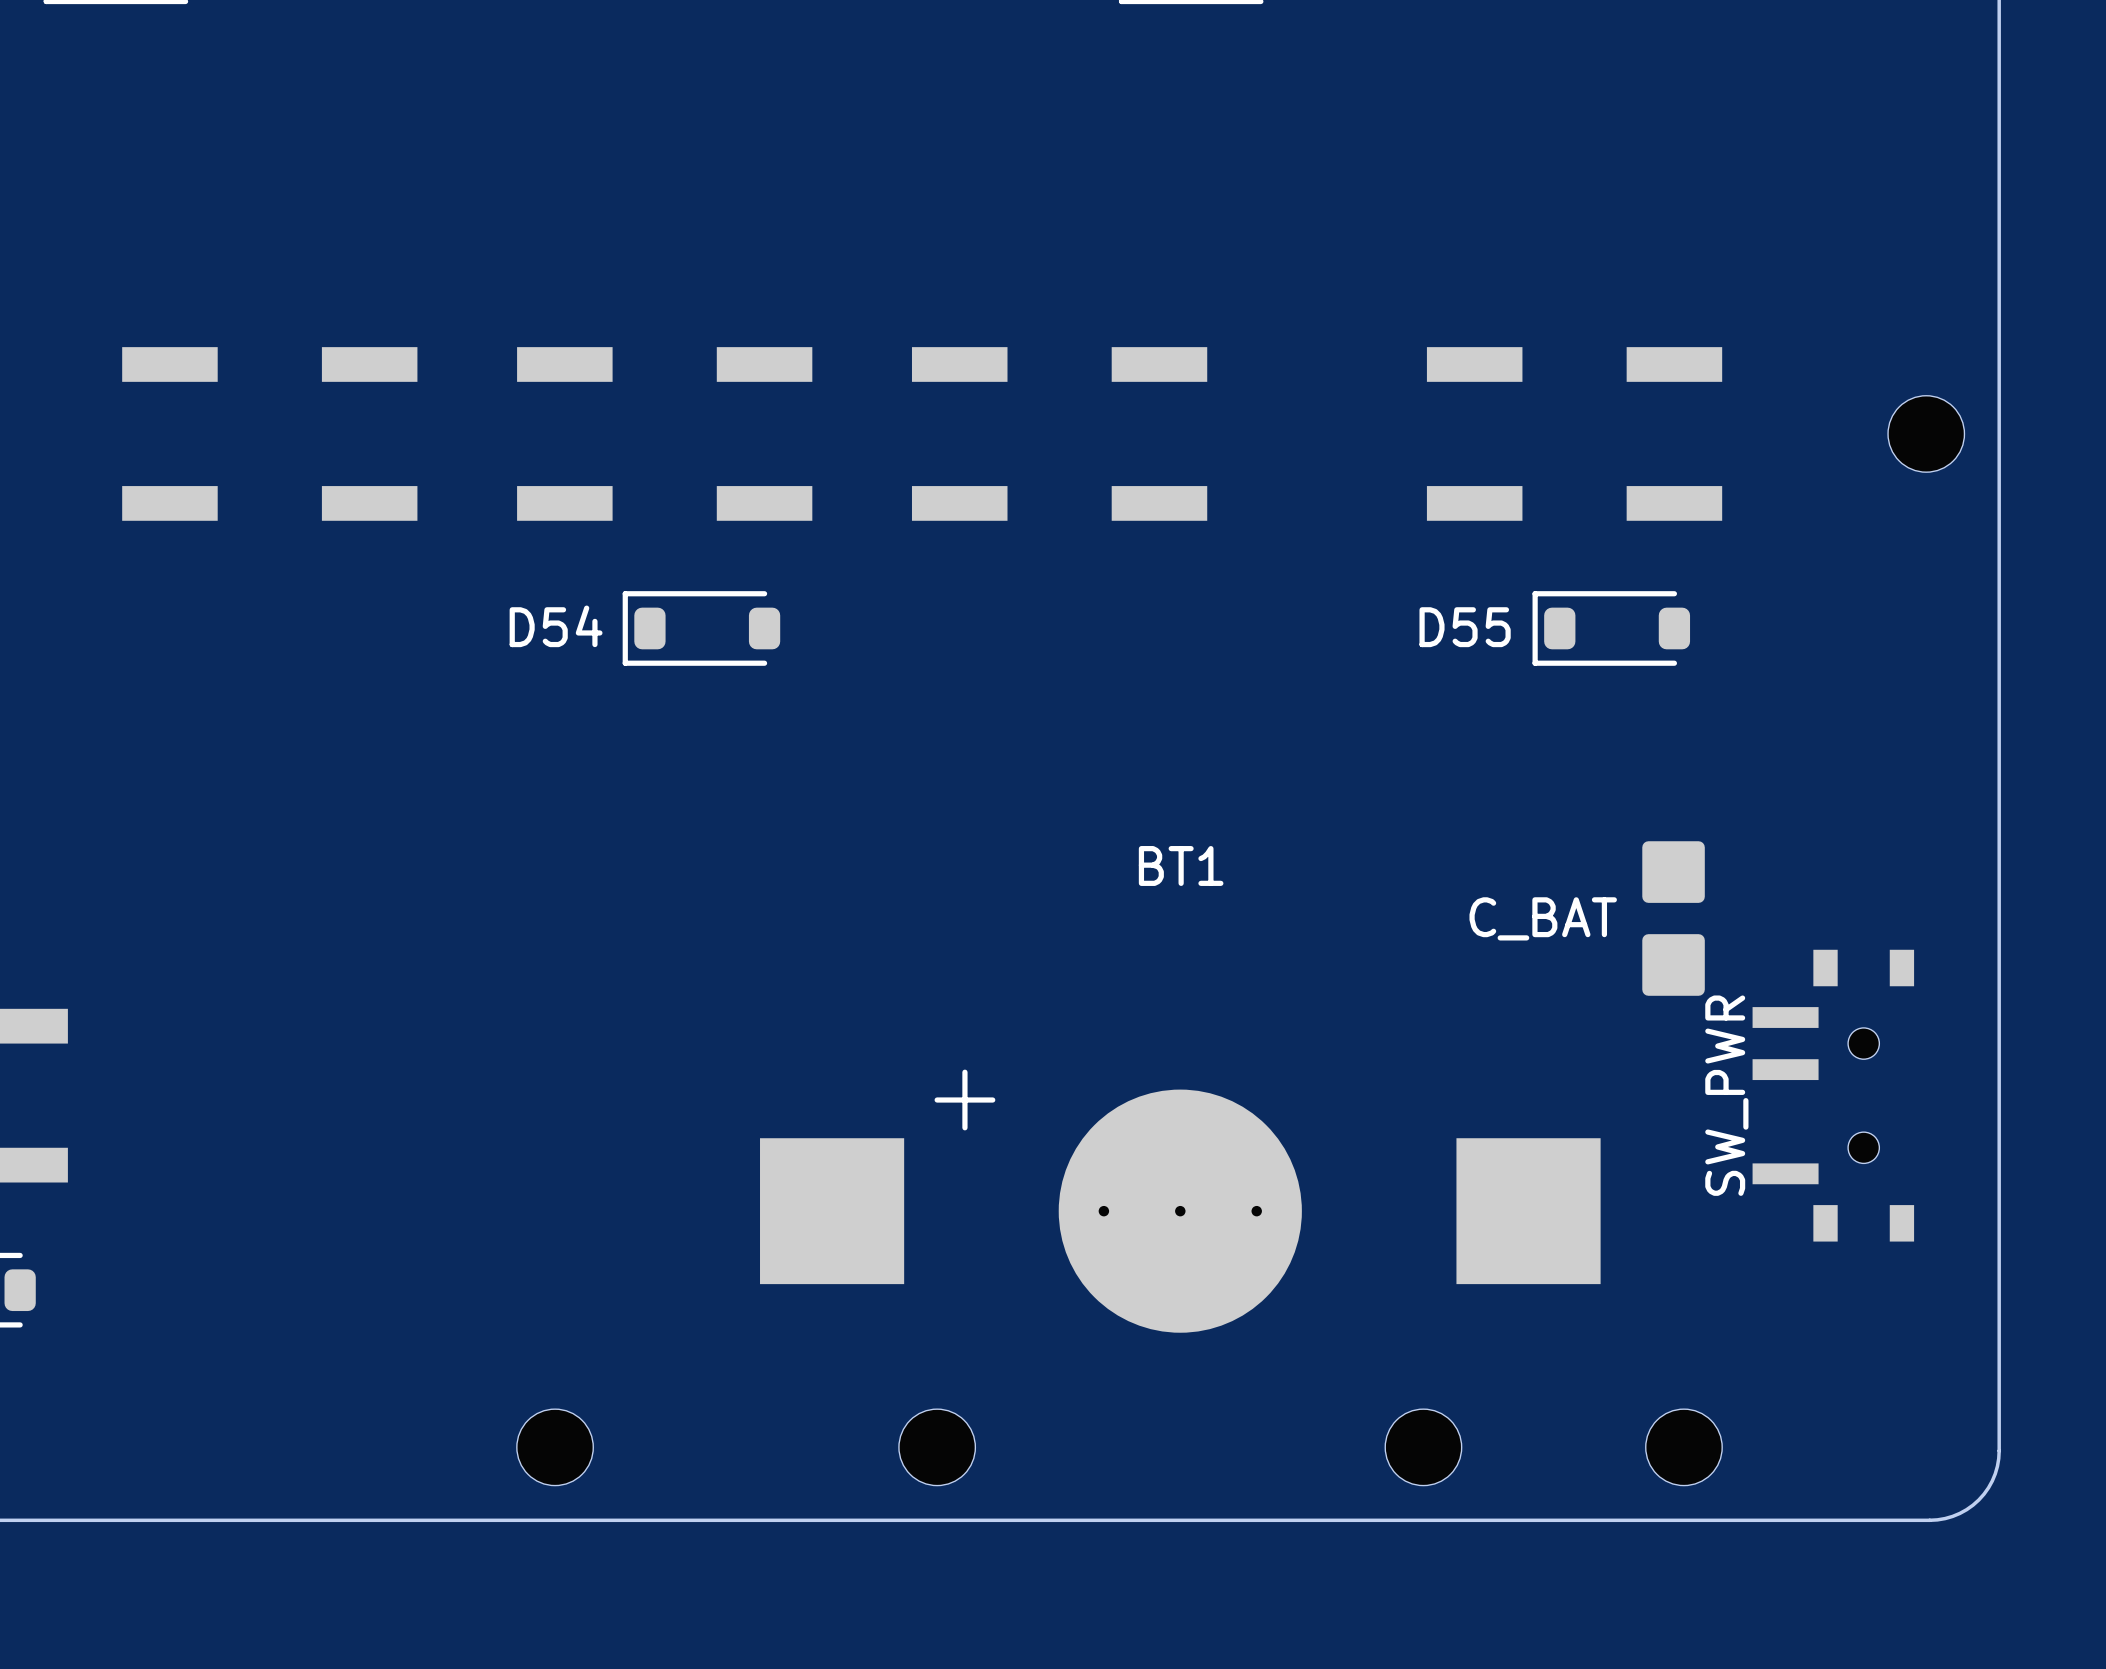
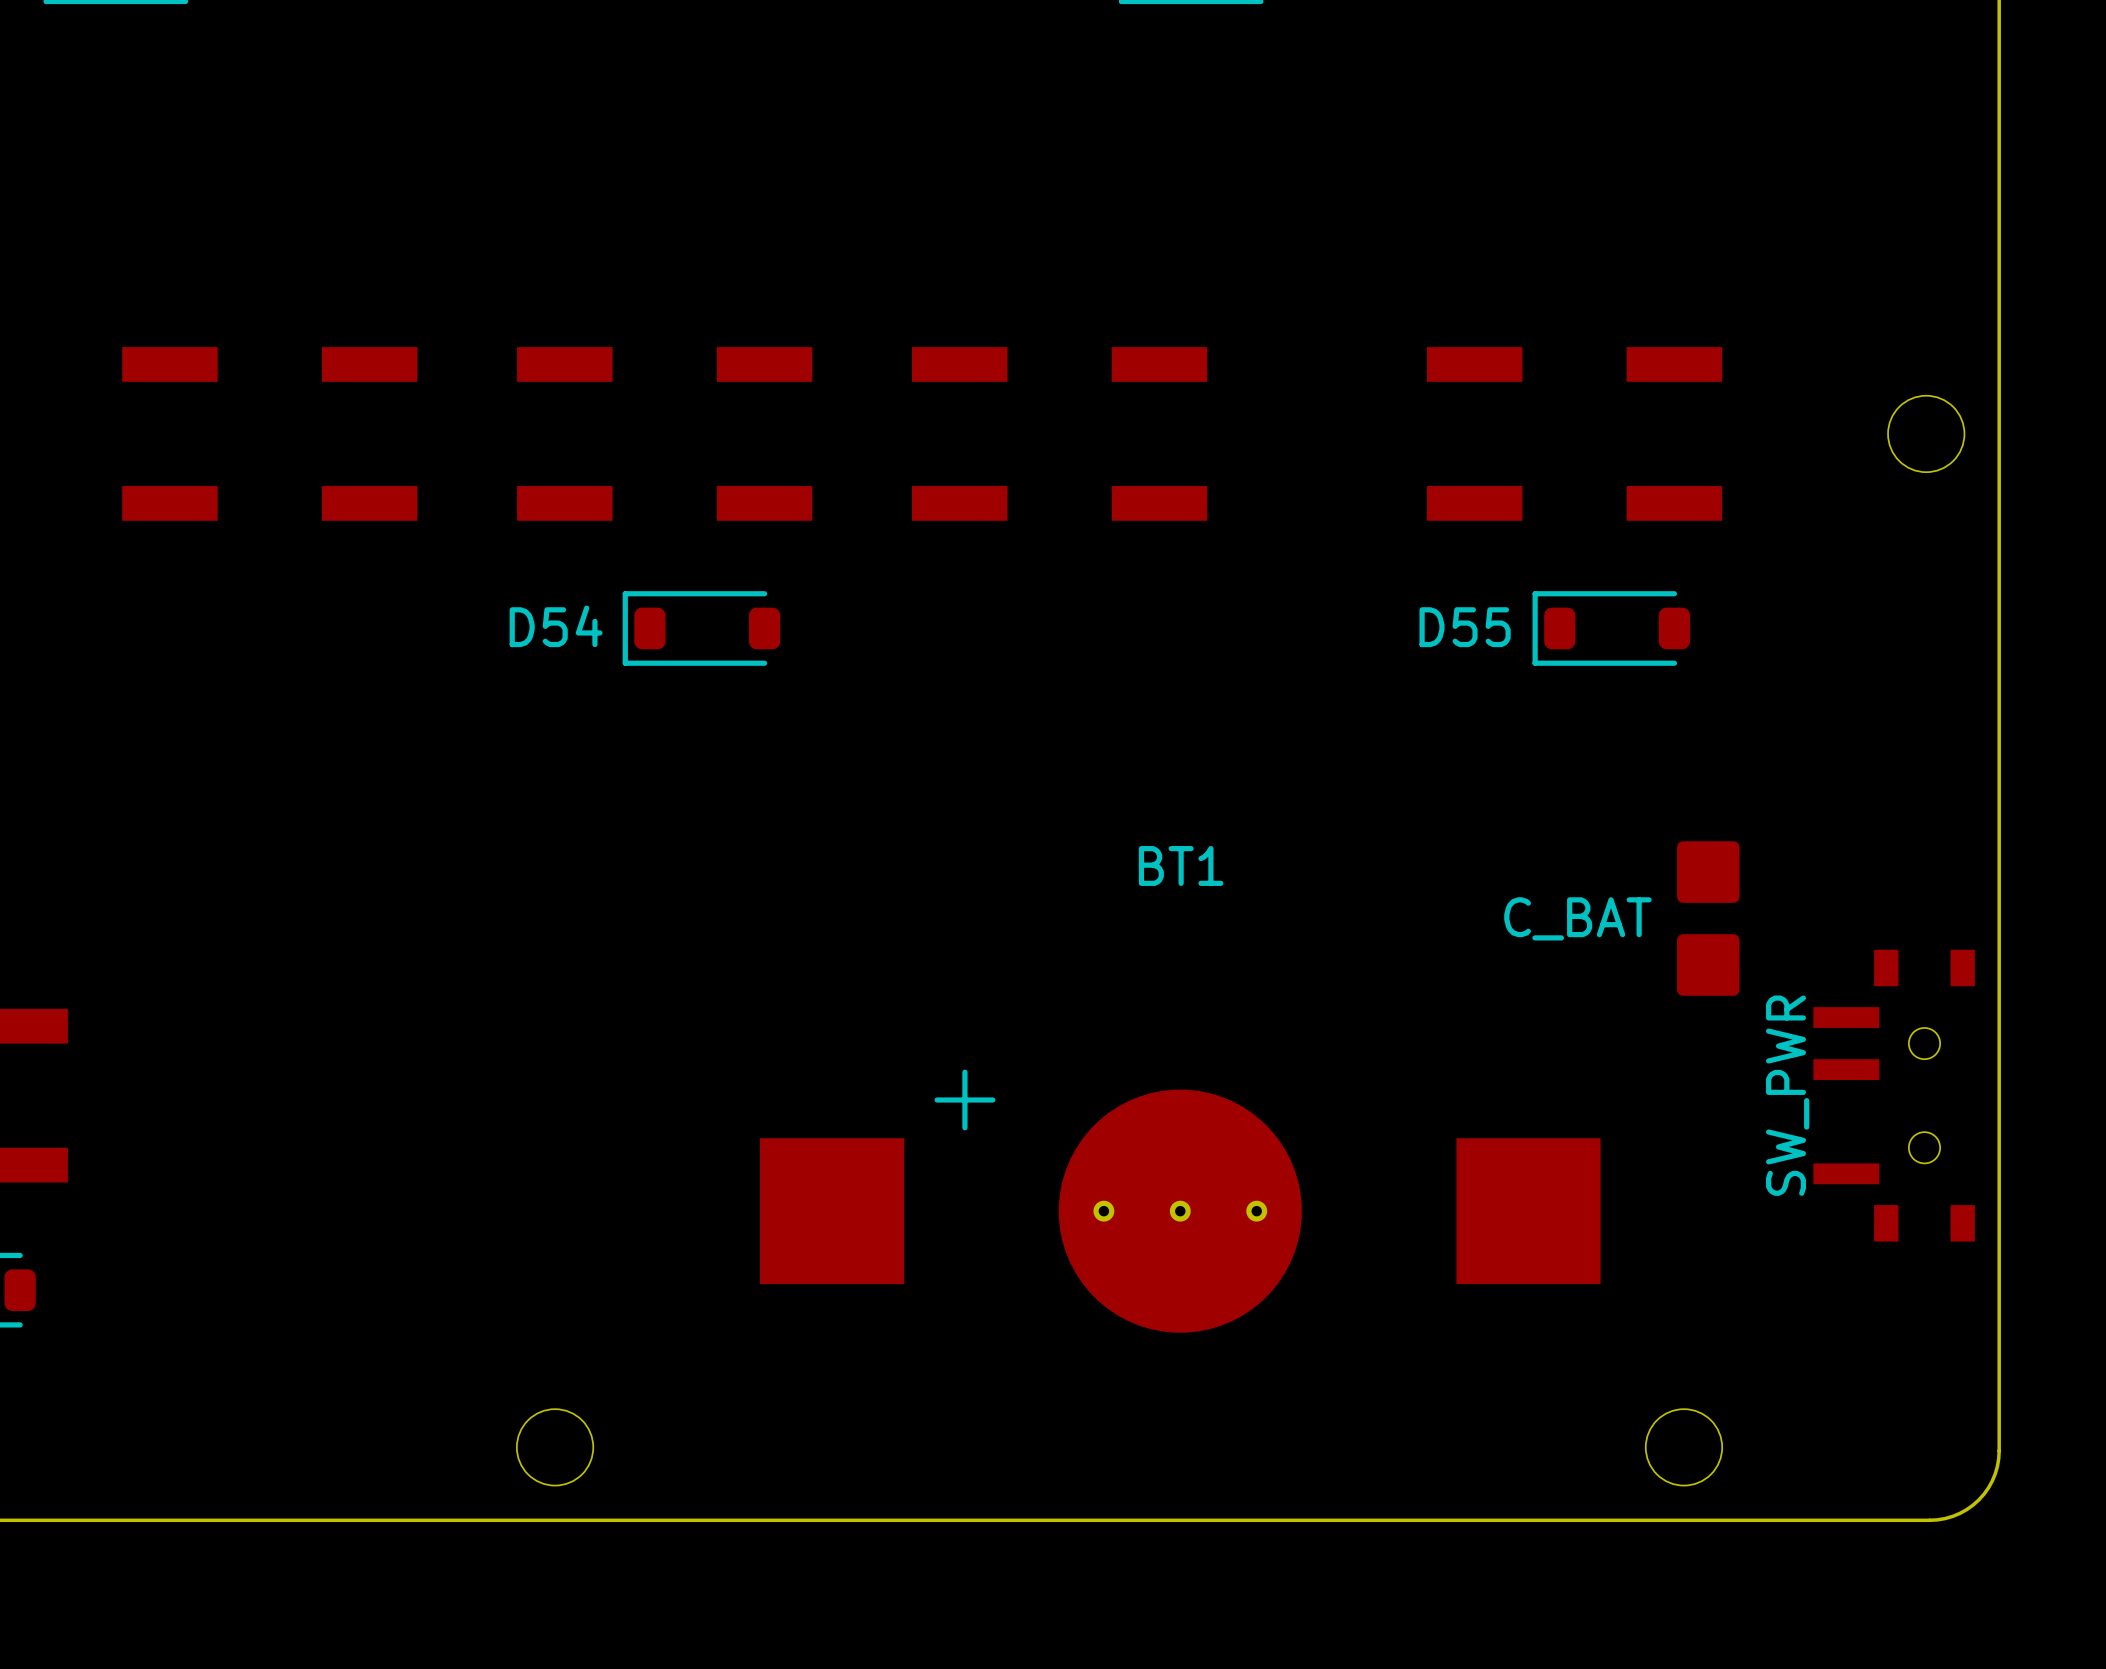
C_BAT position: (1673, 918) -> (1708, 918)
SW_PWR position: (1833, 1095) -> (1894, 1095)
part: (937, 1447) -> none
part: (1423, 1447) -> none

